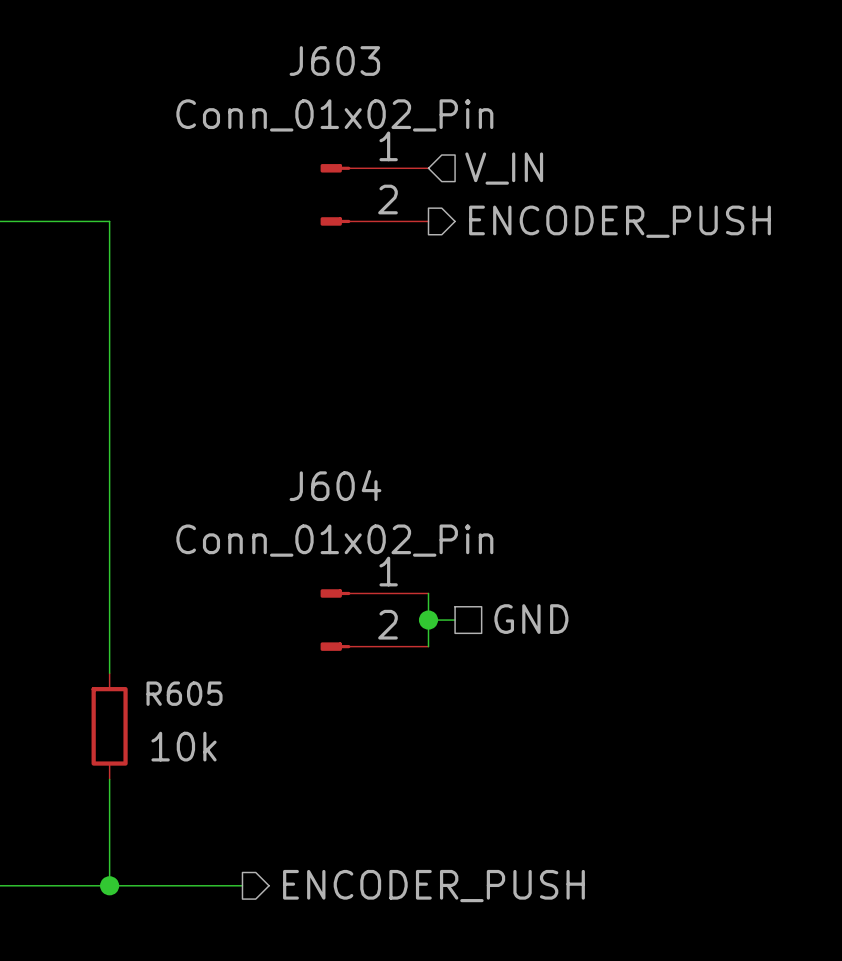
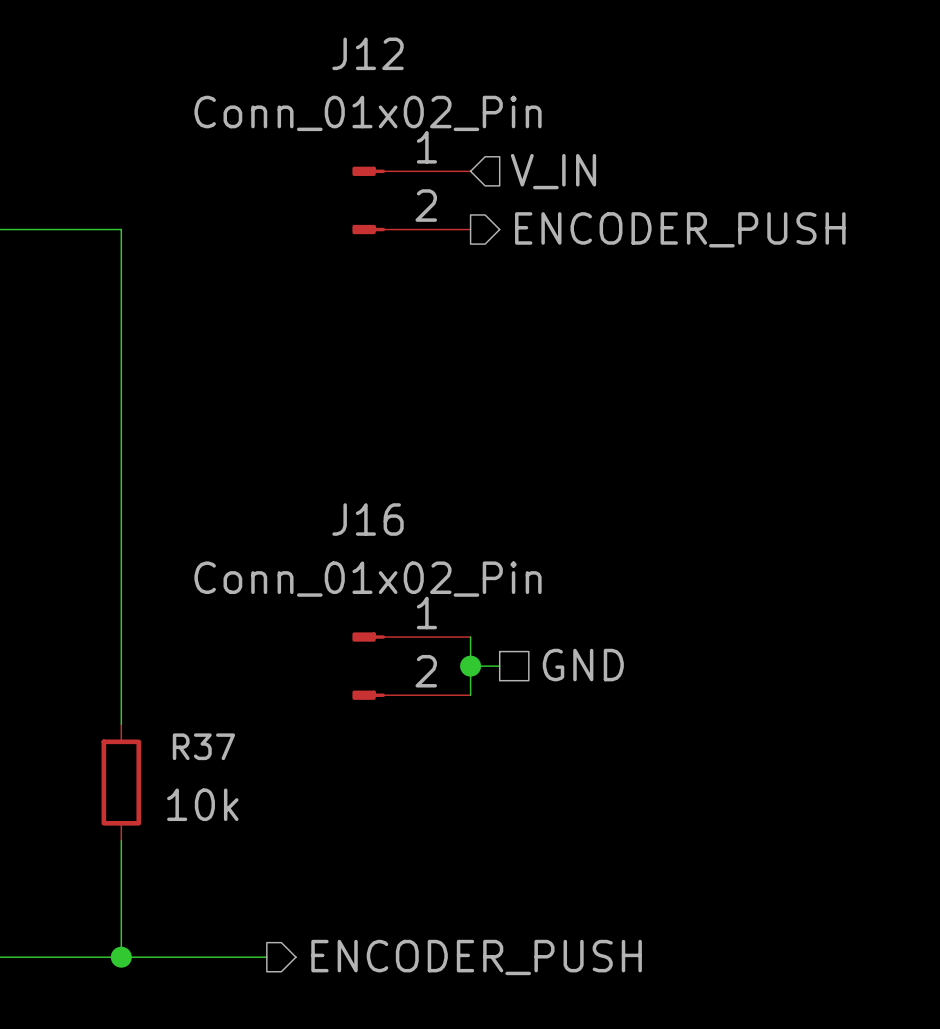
J603 name: J603 (334, 61) -> J12 (368, 53)
J604 name: J604 (335, 485) -> J16 (368, 519)
R605 name: R605 (184, 693) -> R37 (203, 746)

